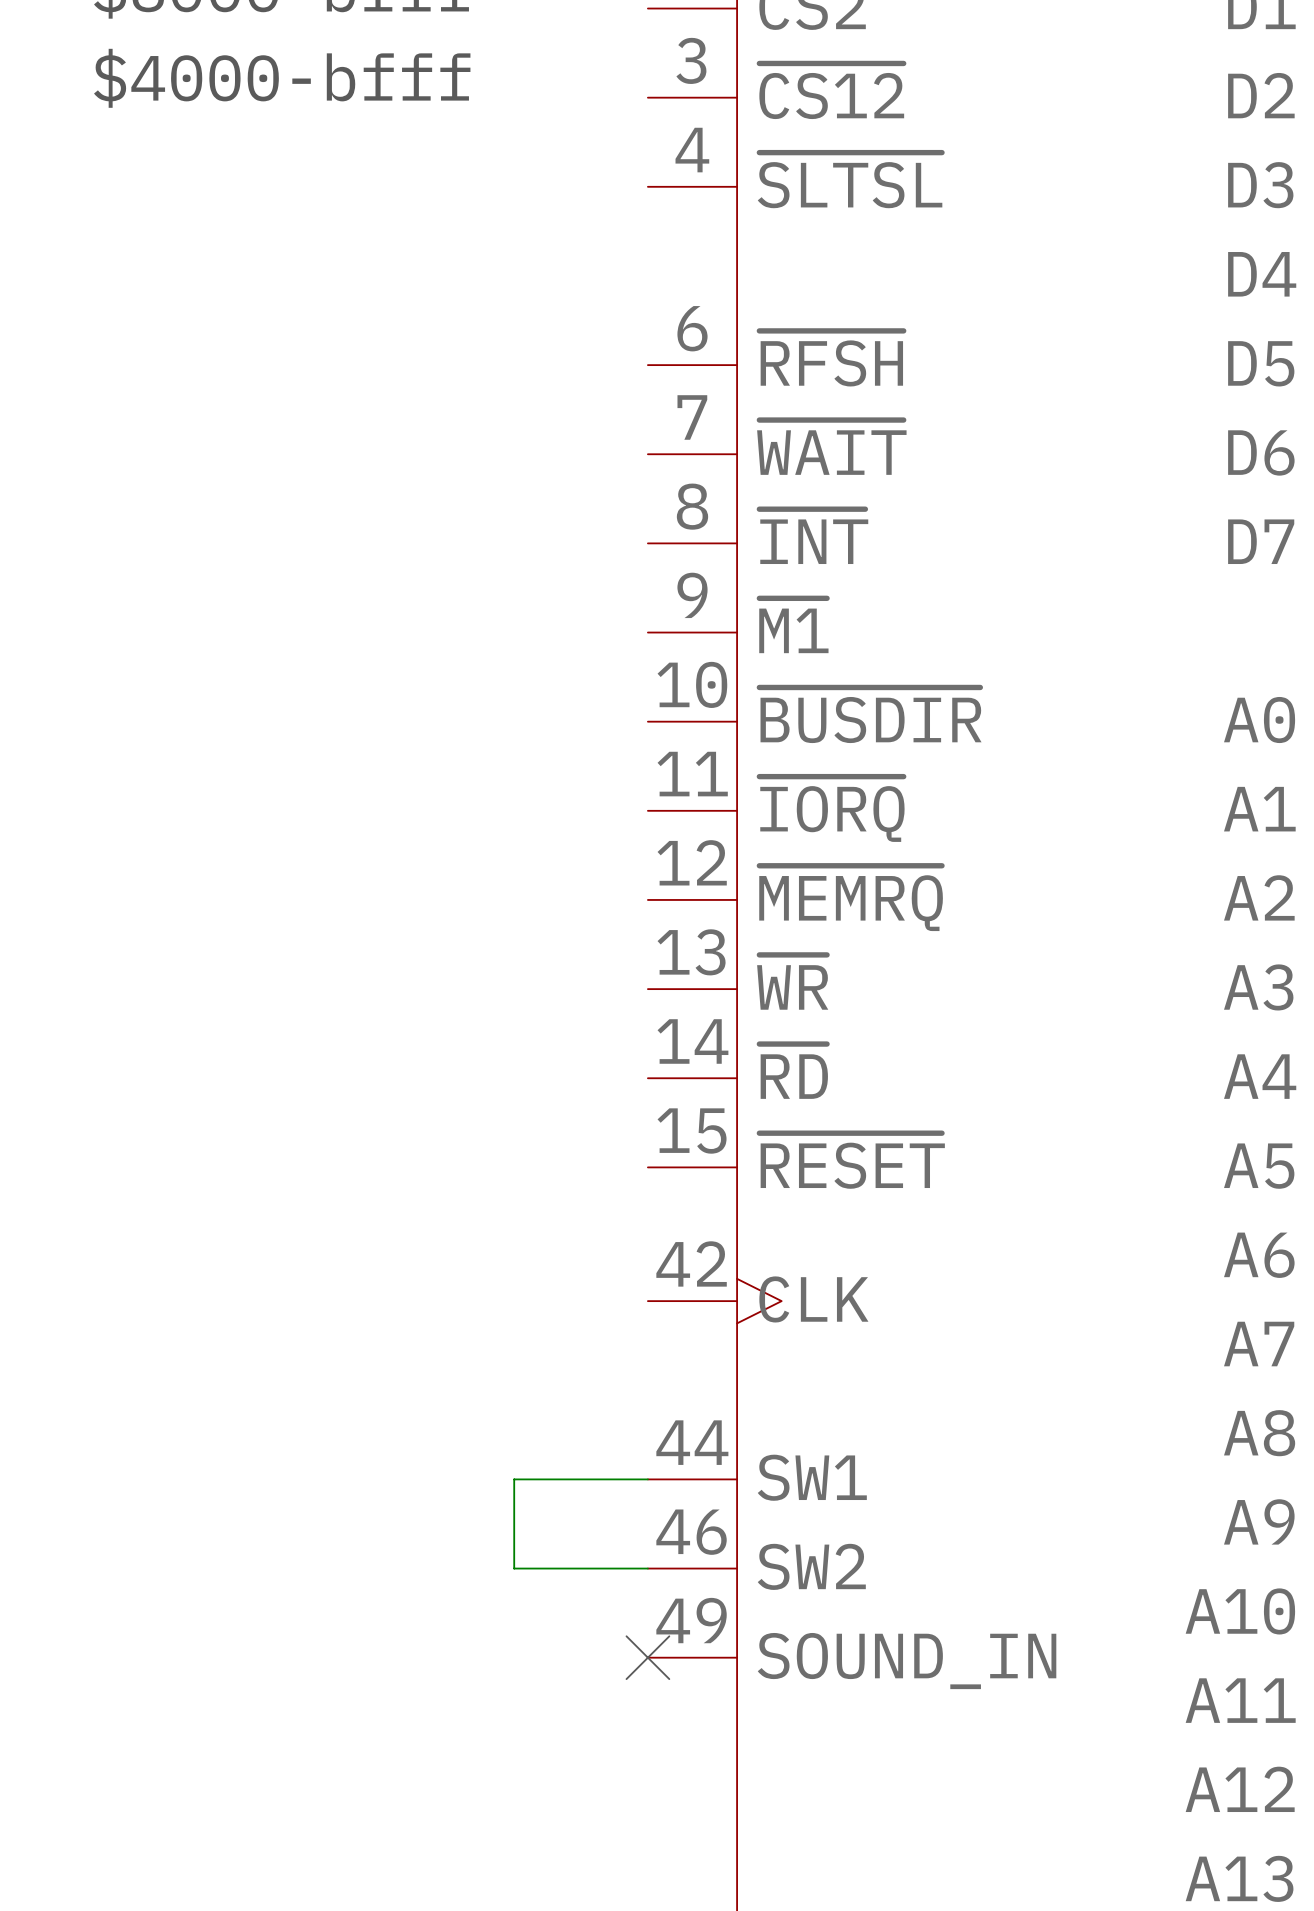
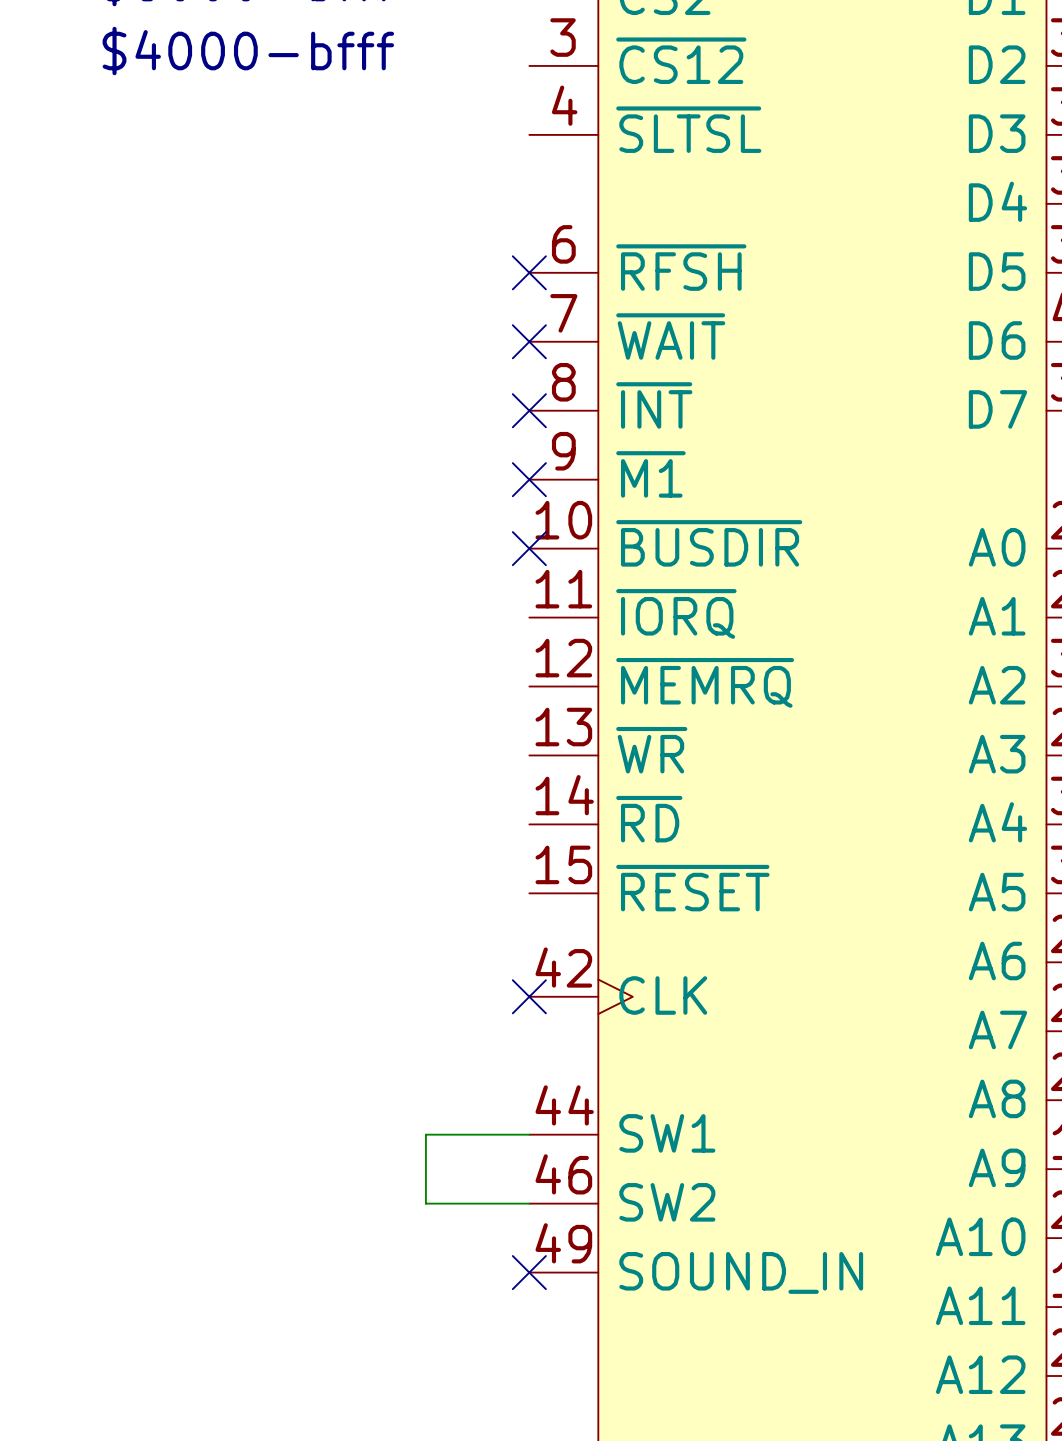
no-connect mark: none -> (529, 272)
no-connect mark: none -> (529, 341)
no-connect mark: none -> (529, 410)
no-connect mark: none -> (529, 479)
no-connect mark: none -> (529, 548)
no-connect mark: none -> (529, 996)

